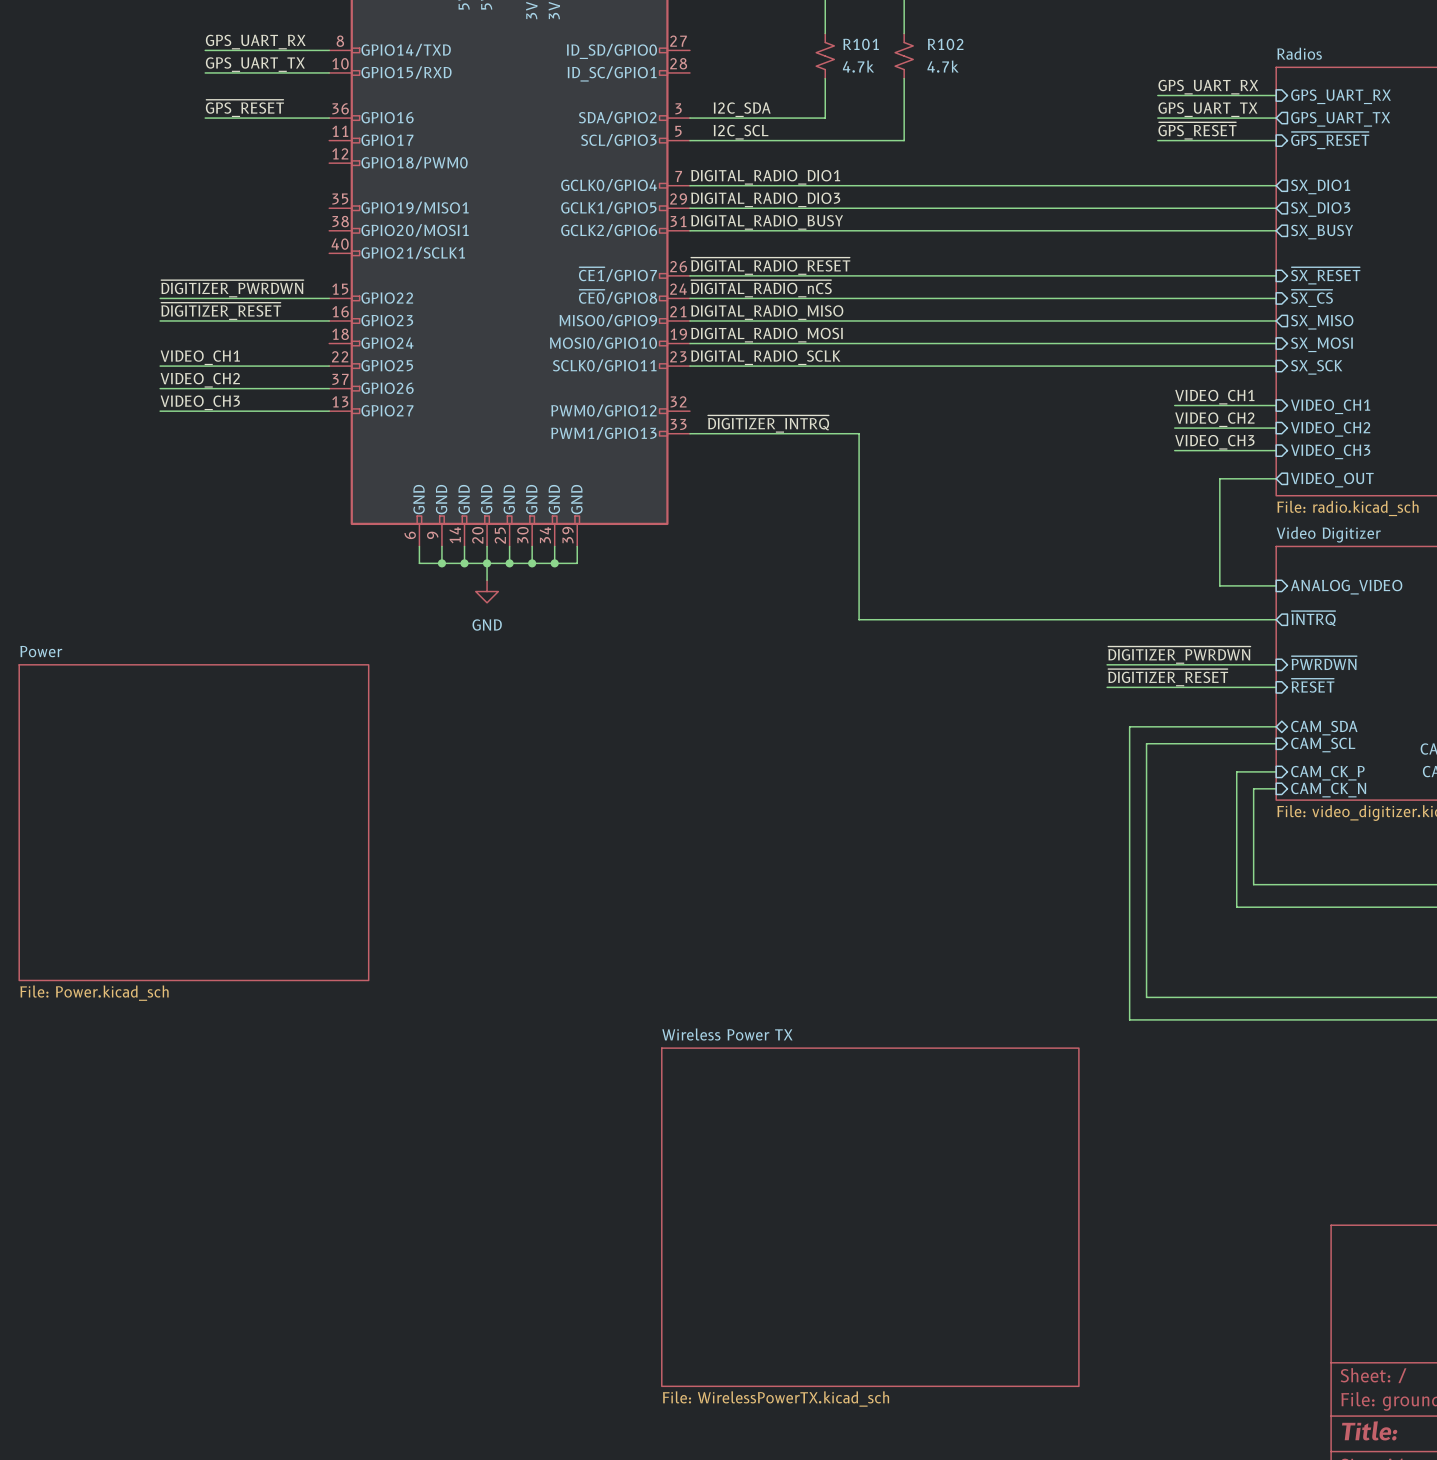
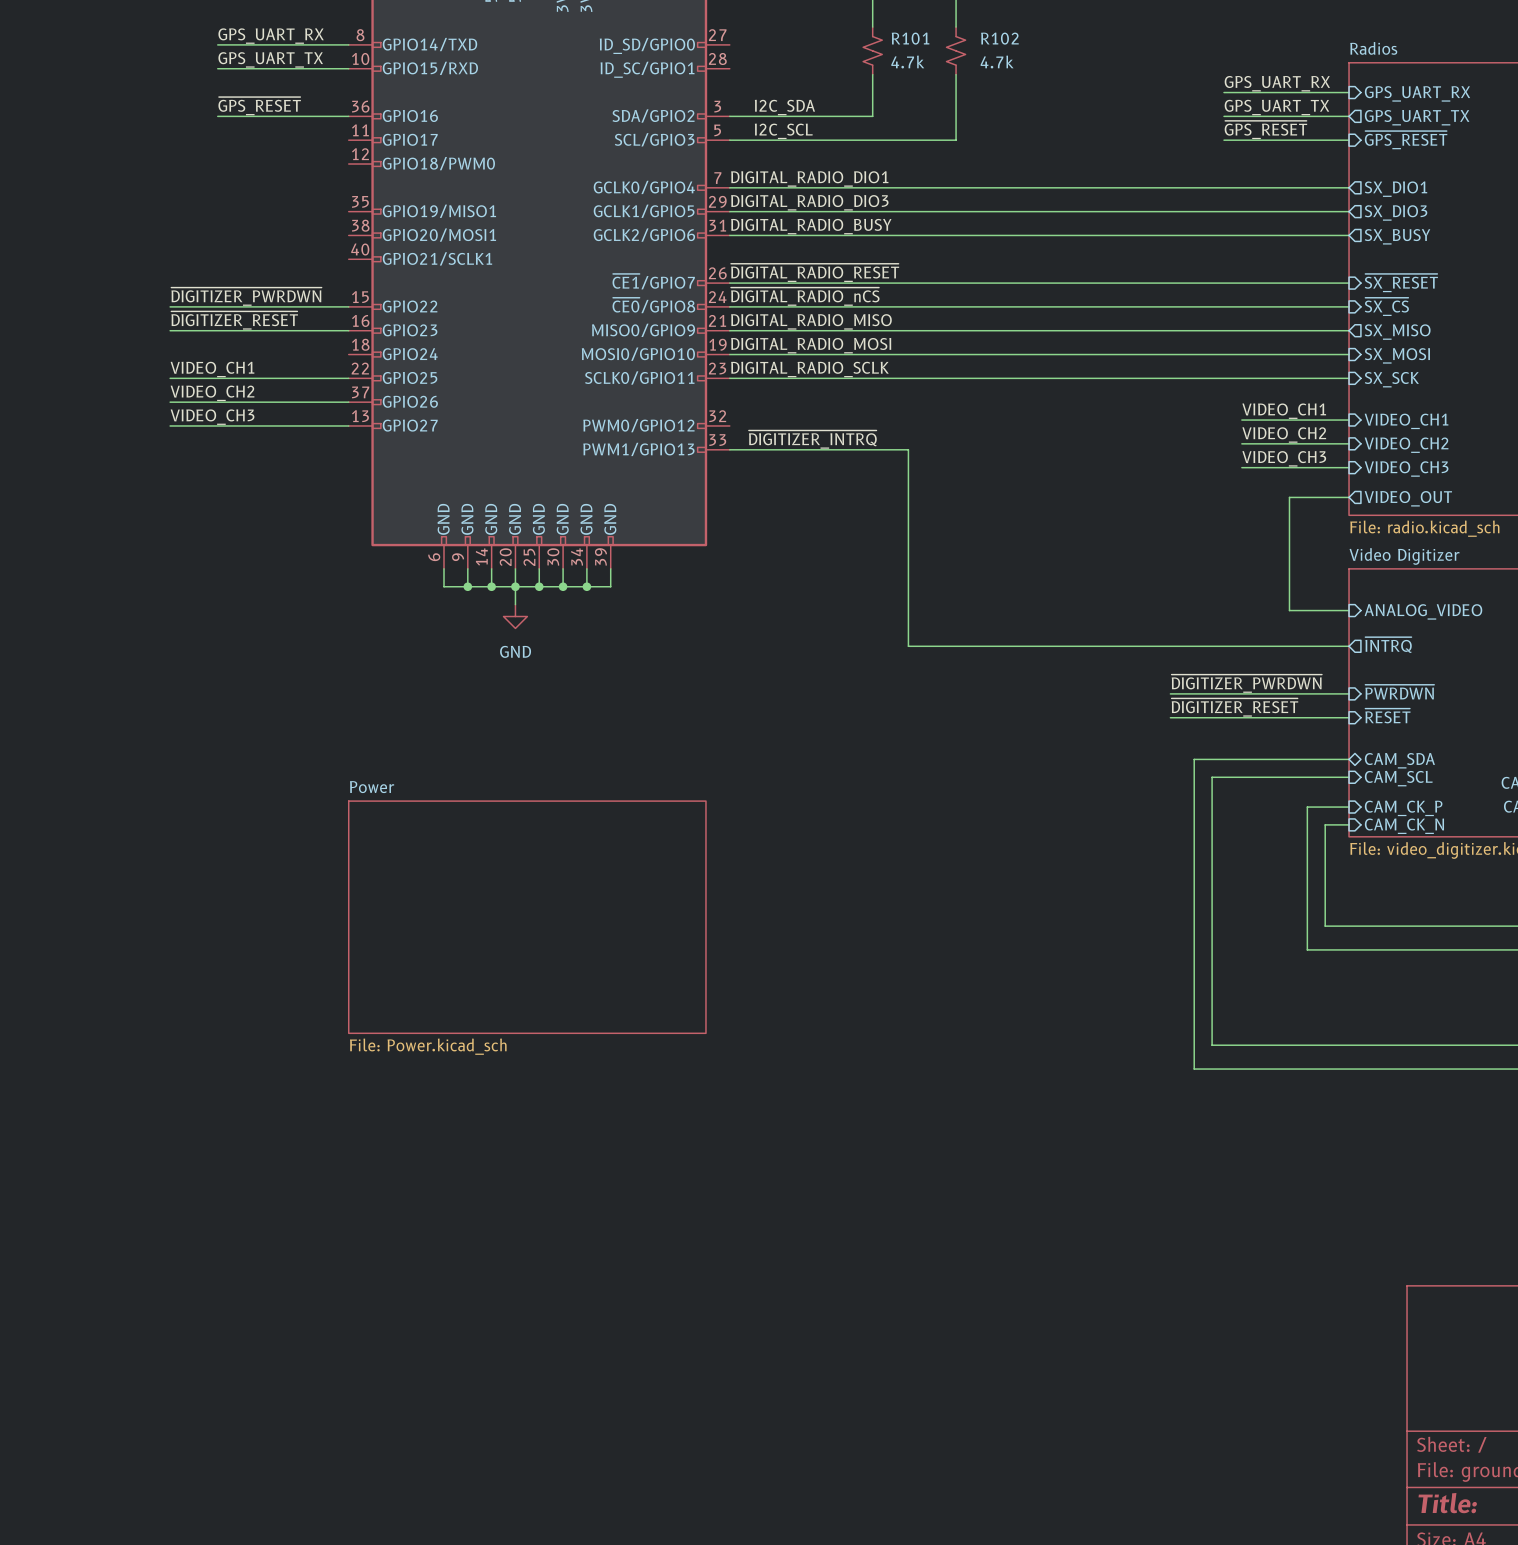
sheet Power: File: Power.kicad_sch (193, 822) -> none
sheet Power: none -> File: Power.kicad_sch (527, 917)
sheet Wireless Power TX: File: WirelessPowerTX.kicad_sch (870, 1217) -> none

